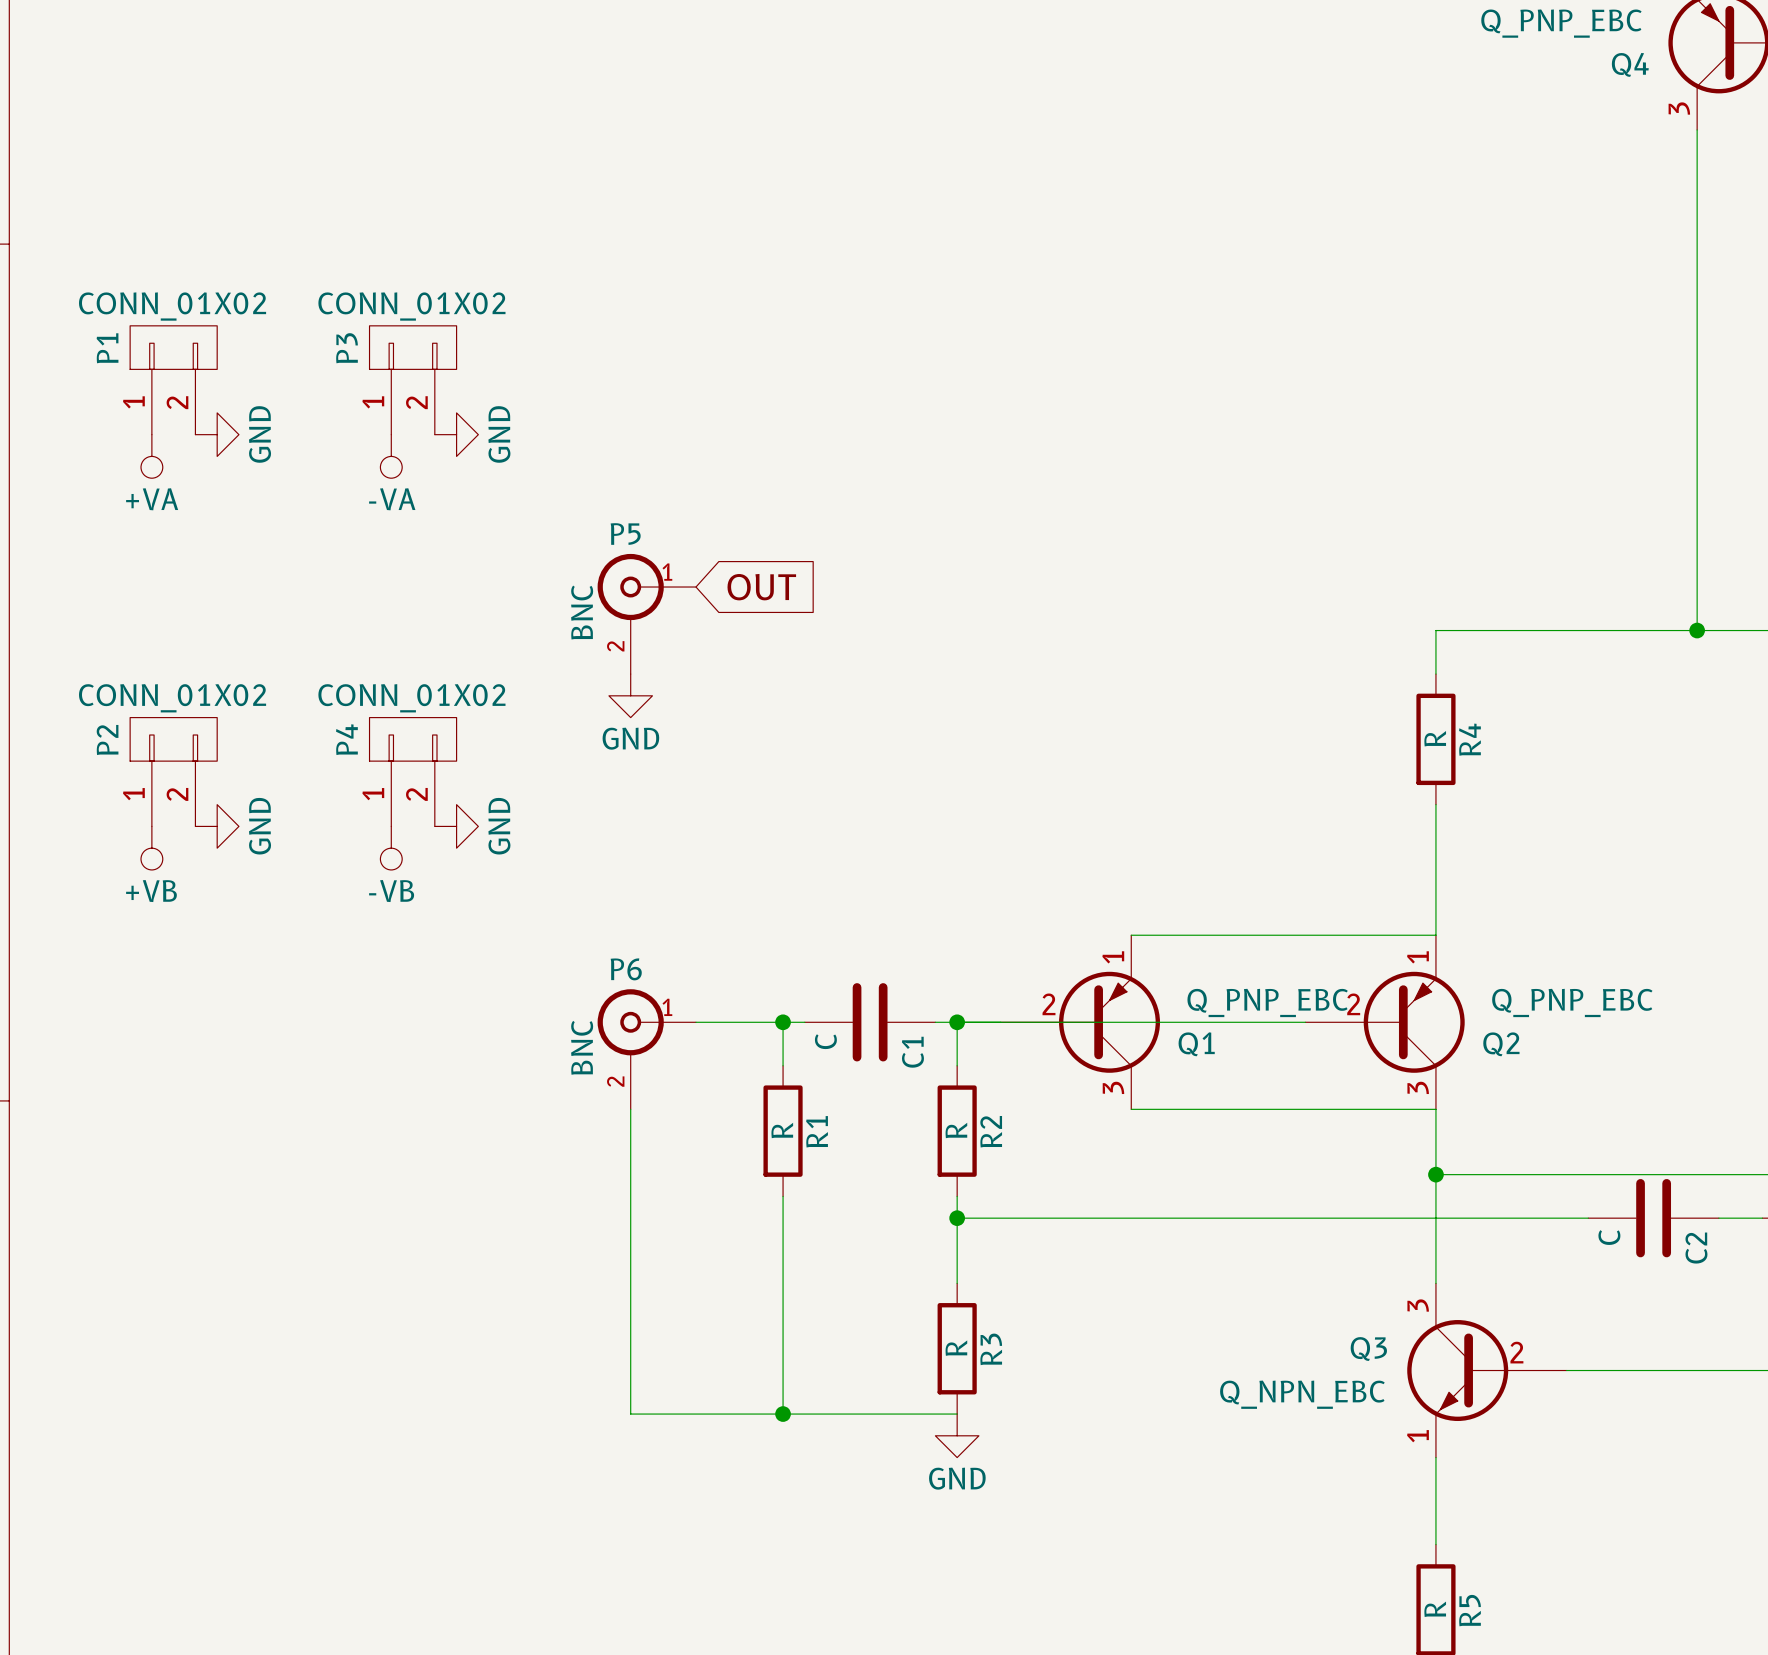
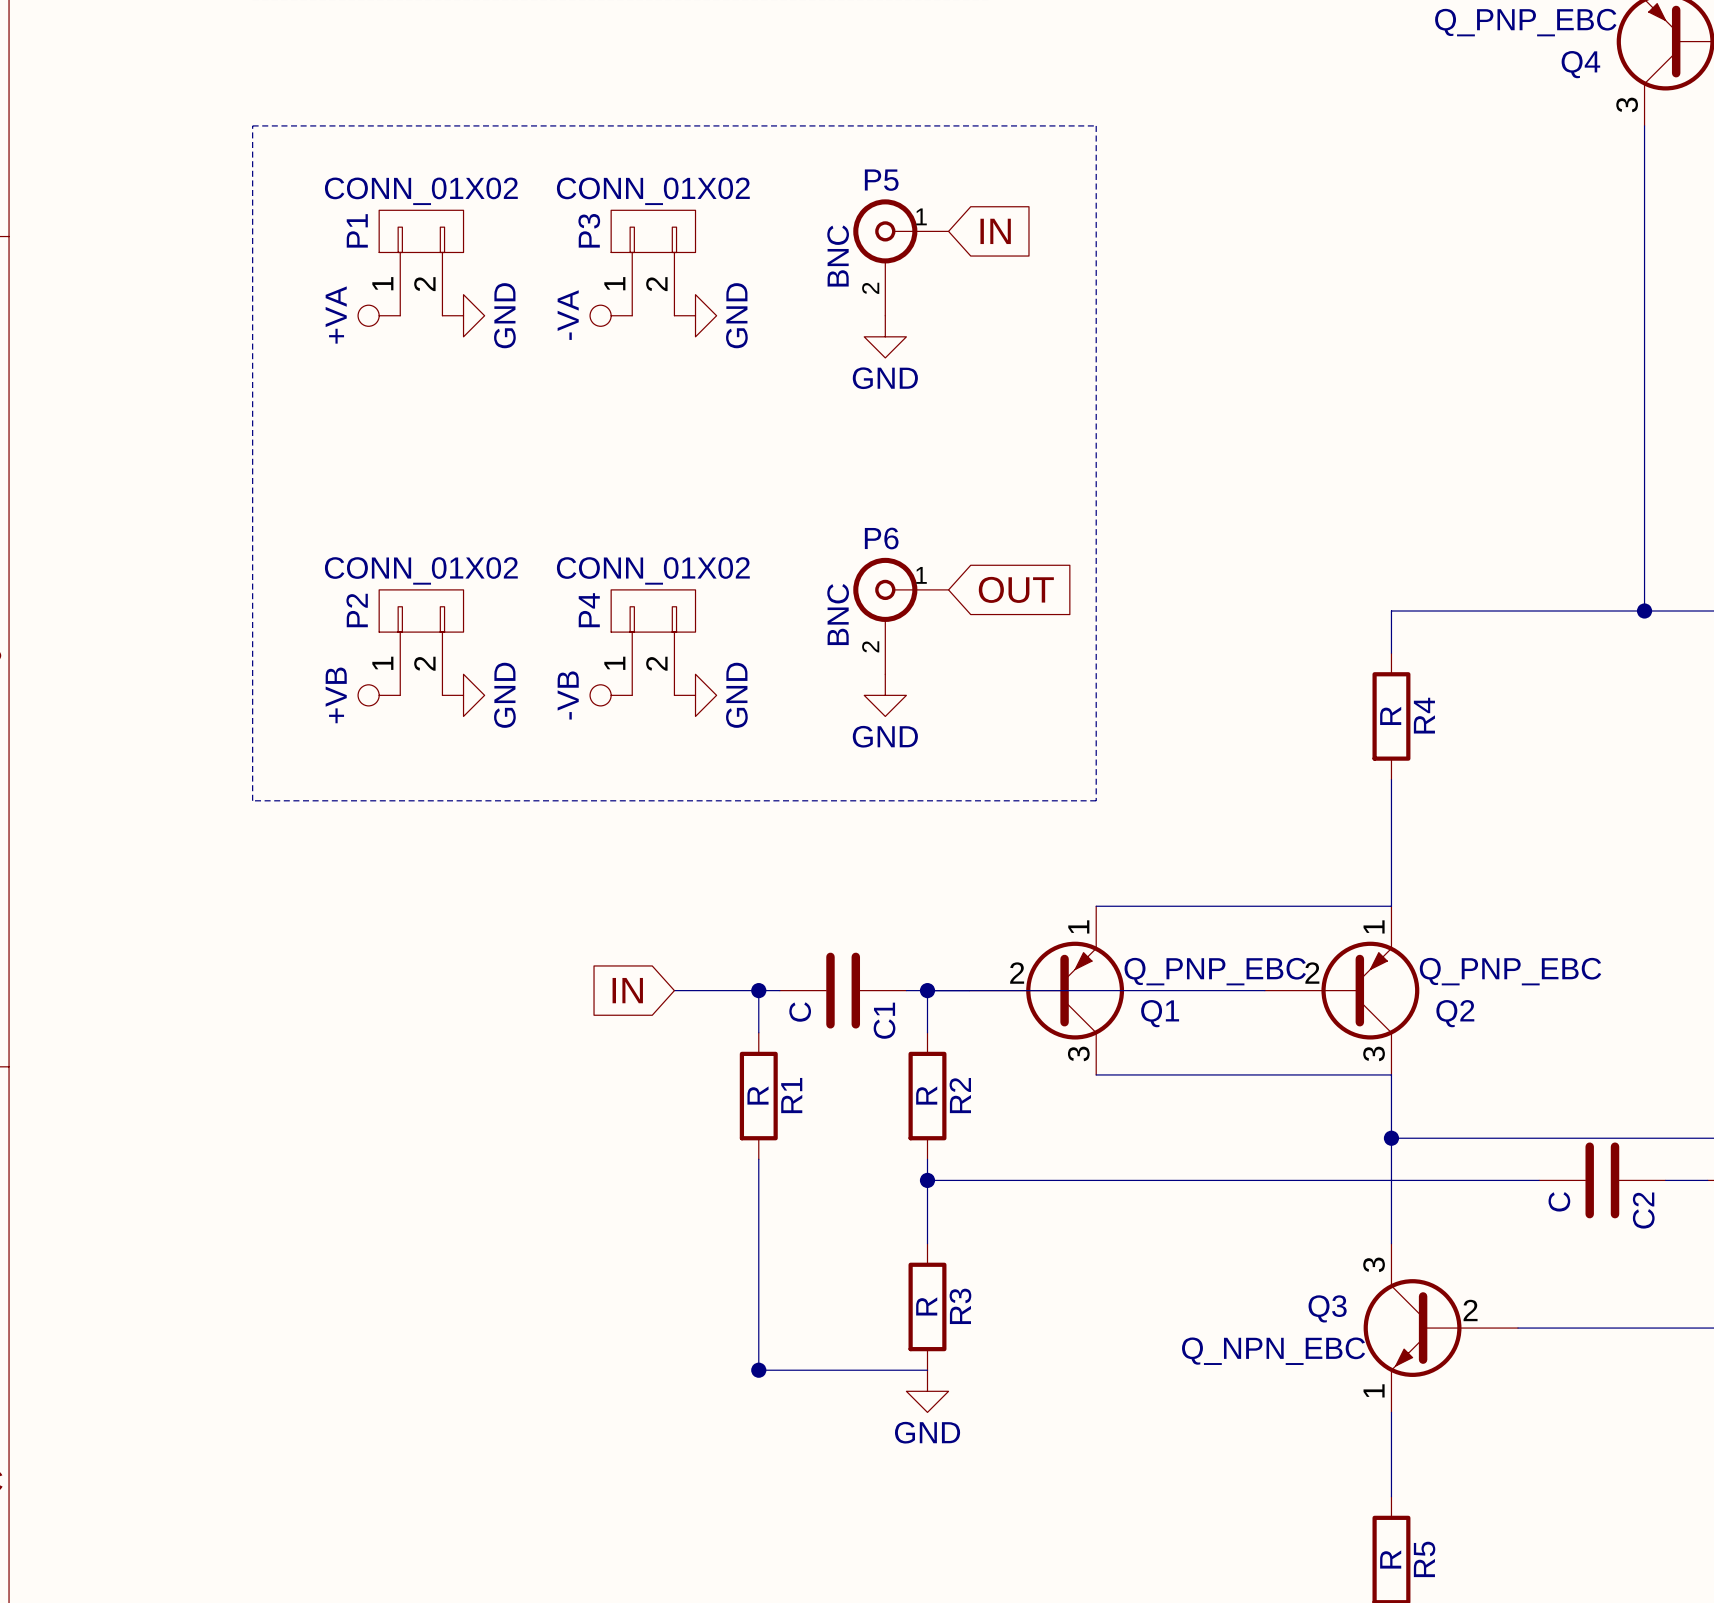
line: none -> (252, 125) (252, 800) (1096, 800) (1096, 125) (252, 125)
global label: none -> IN (995, 231)
power symbol: none -> GND (695, 315)
power symbol: none -> GND (885, 336)
P1 position: (173, 380) -> (421, 263)
P3 position: (413, 380) -> (653, 263)
power symbol: GND (217, 434) -> none
power symbol position: GND (456, 434) -> GND (463, 315)
power symbol rotation: 0° (151, 456) -> 90° clockwise (379, 315)
power symbol position: +VA (151, 456) -> +VA (379, 315)
power symbol rotation: 0° (391, 456) -> 90° clockwise (611, 315)
power symbol position: -VA (391, 456) -> -VA (611, 315)
global label position: OUT (761, 587) -> OUT (1016, 589)
P5 position: (646, 614) -> (900, 257)
power symbol: GND (630, 695) -> none
power symbol: none -> GND (463, 695)
power symbol: none -> GND (695, 695)
power symbol: none -> GND (885, 695)
P2 position: (173, 772) -> (421, 642)
P4 position: (413, 772) -> (653, 642)
power symbol: GND (217, 826) -> none
power symbol: GND (456, 826) -> none
power symbol rotation: 0° (151, 848) -> 90° clockwise (379, 695)
power symbol position: +VB (151, 848) -> +VB (379, 695)
power symbol rotation: 0° (391, 848) -> 90° clockwise (611, 695)
power symbol position: -VB (391, 848) -> -VB (611, 695)
global label: none -> IN (627, 990)
P6 position: (646, 1049) -> (900, 616)
wire: (630, 1109) (630, 1414) (783, 1414) -> none

